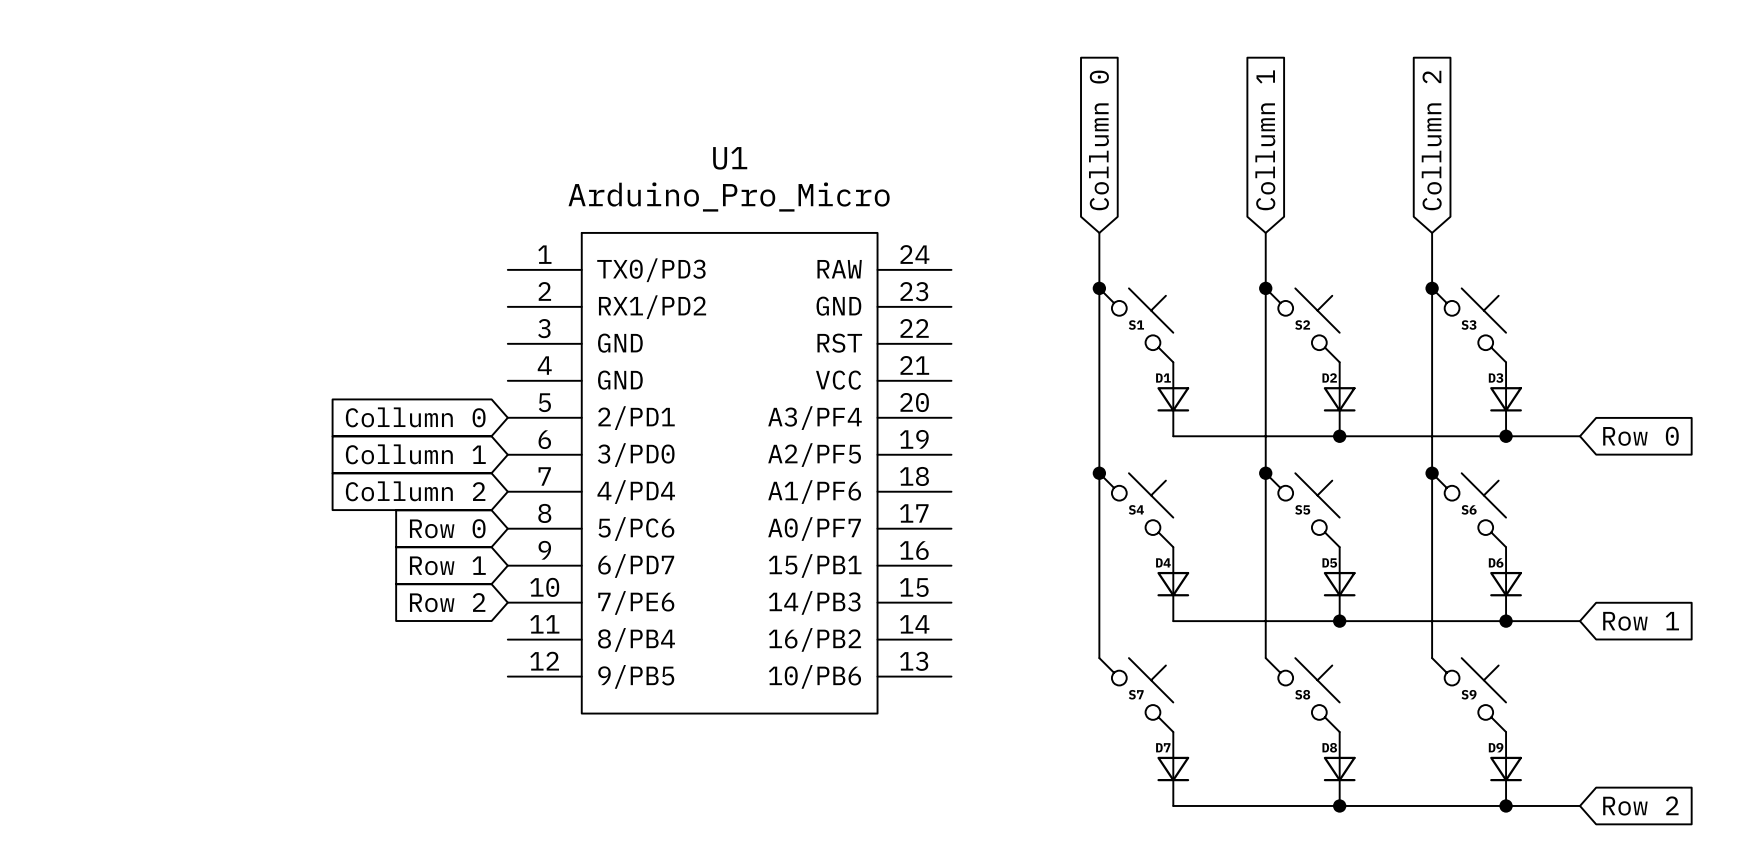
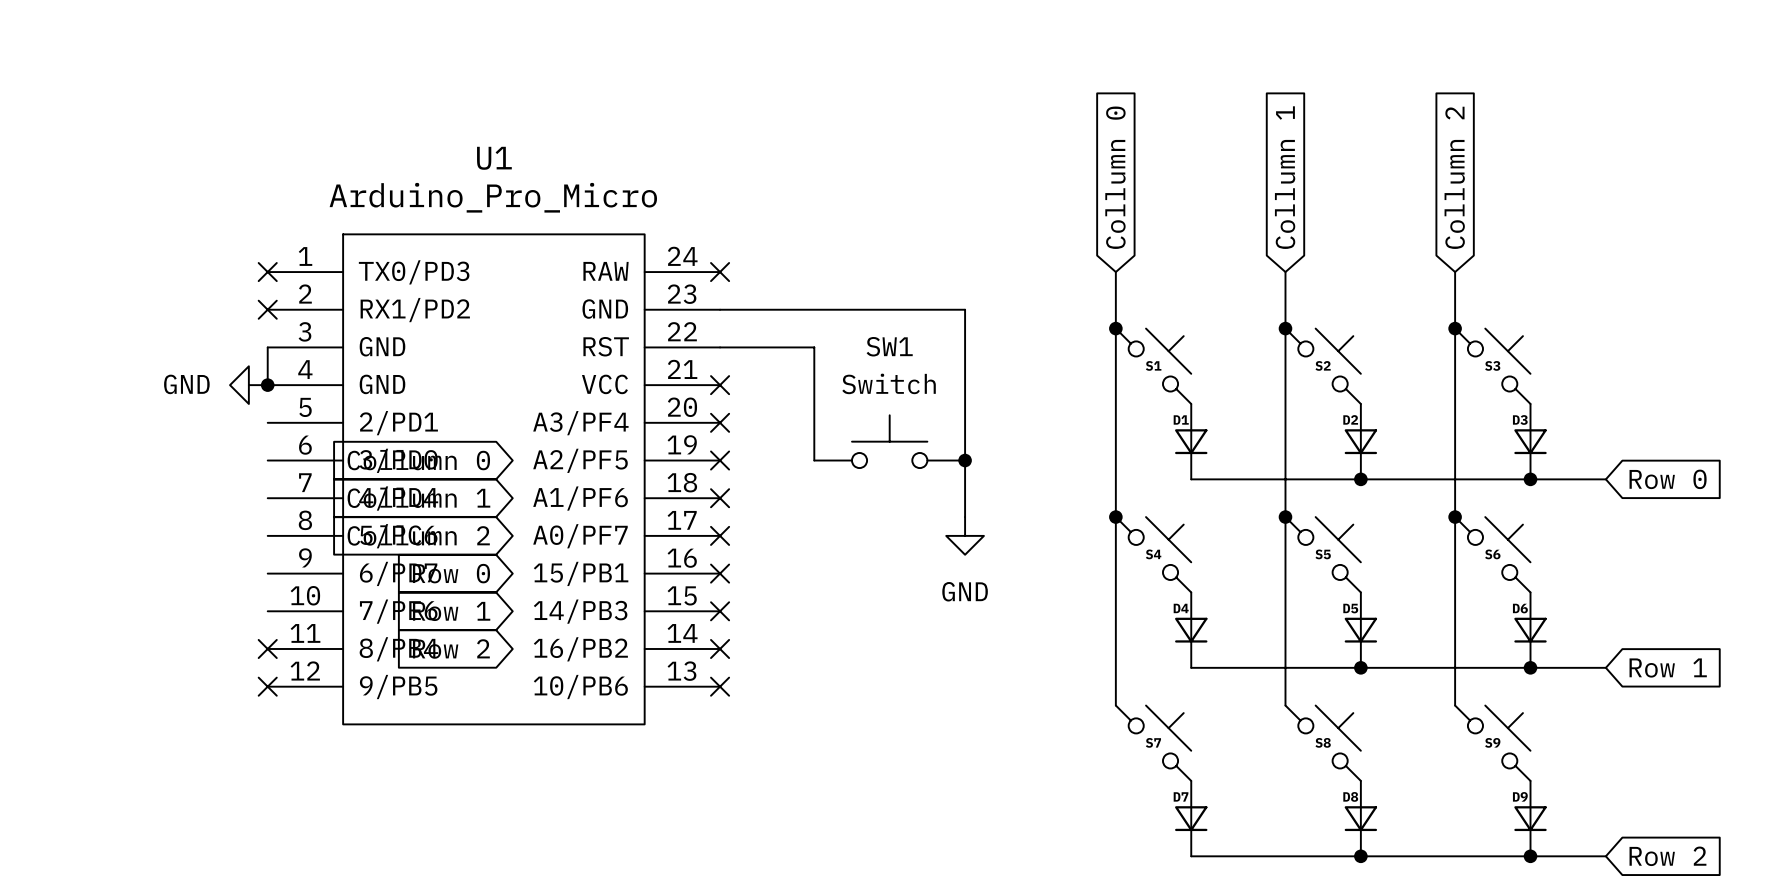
no-connect mark: none -> (267, 272)
no-connect mark: none -> (720, 272)
no-connect mark: none -> (267, 309)
wire: none -> (720, 309) (965, 309) (965, 517)
wire: none -> (267, 347) (267, 385)
wire: none -> (720, 347) (814, 347) (814, 460)
power symbol: none -> GND (248, 385)
junction: none -> (267, 385)
no-connect mark: none -> (720, 385)
no-connect mark: none -> (720, 422)
SW1: none -> Switch (889, 441)
no-connect mark: none -> (720, 460)
junction: none -> (965, 460)
no-connect mark: none -> (720, 498)
U1 position: (729, 473) -> (493, 479)
no-connect mark: none -> (720, 535)
power symbol: none -> GND (965, 535)
no-connect mark: none -> (720, 573)
no-connect mark: none -> (720, 611)
no-connect mark: none -> (267, 648)
no-connect mark: none -> (720, 648)
no-connect mark: none -> (267, 686)
no-connect mark: none -> (720, 686)

